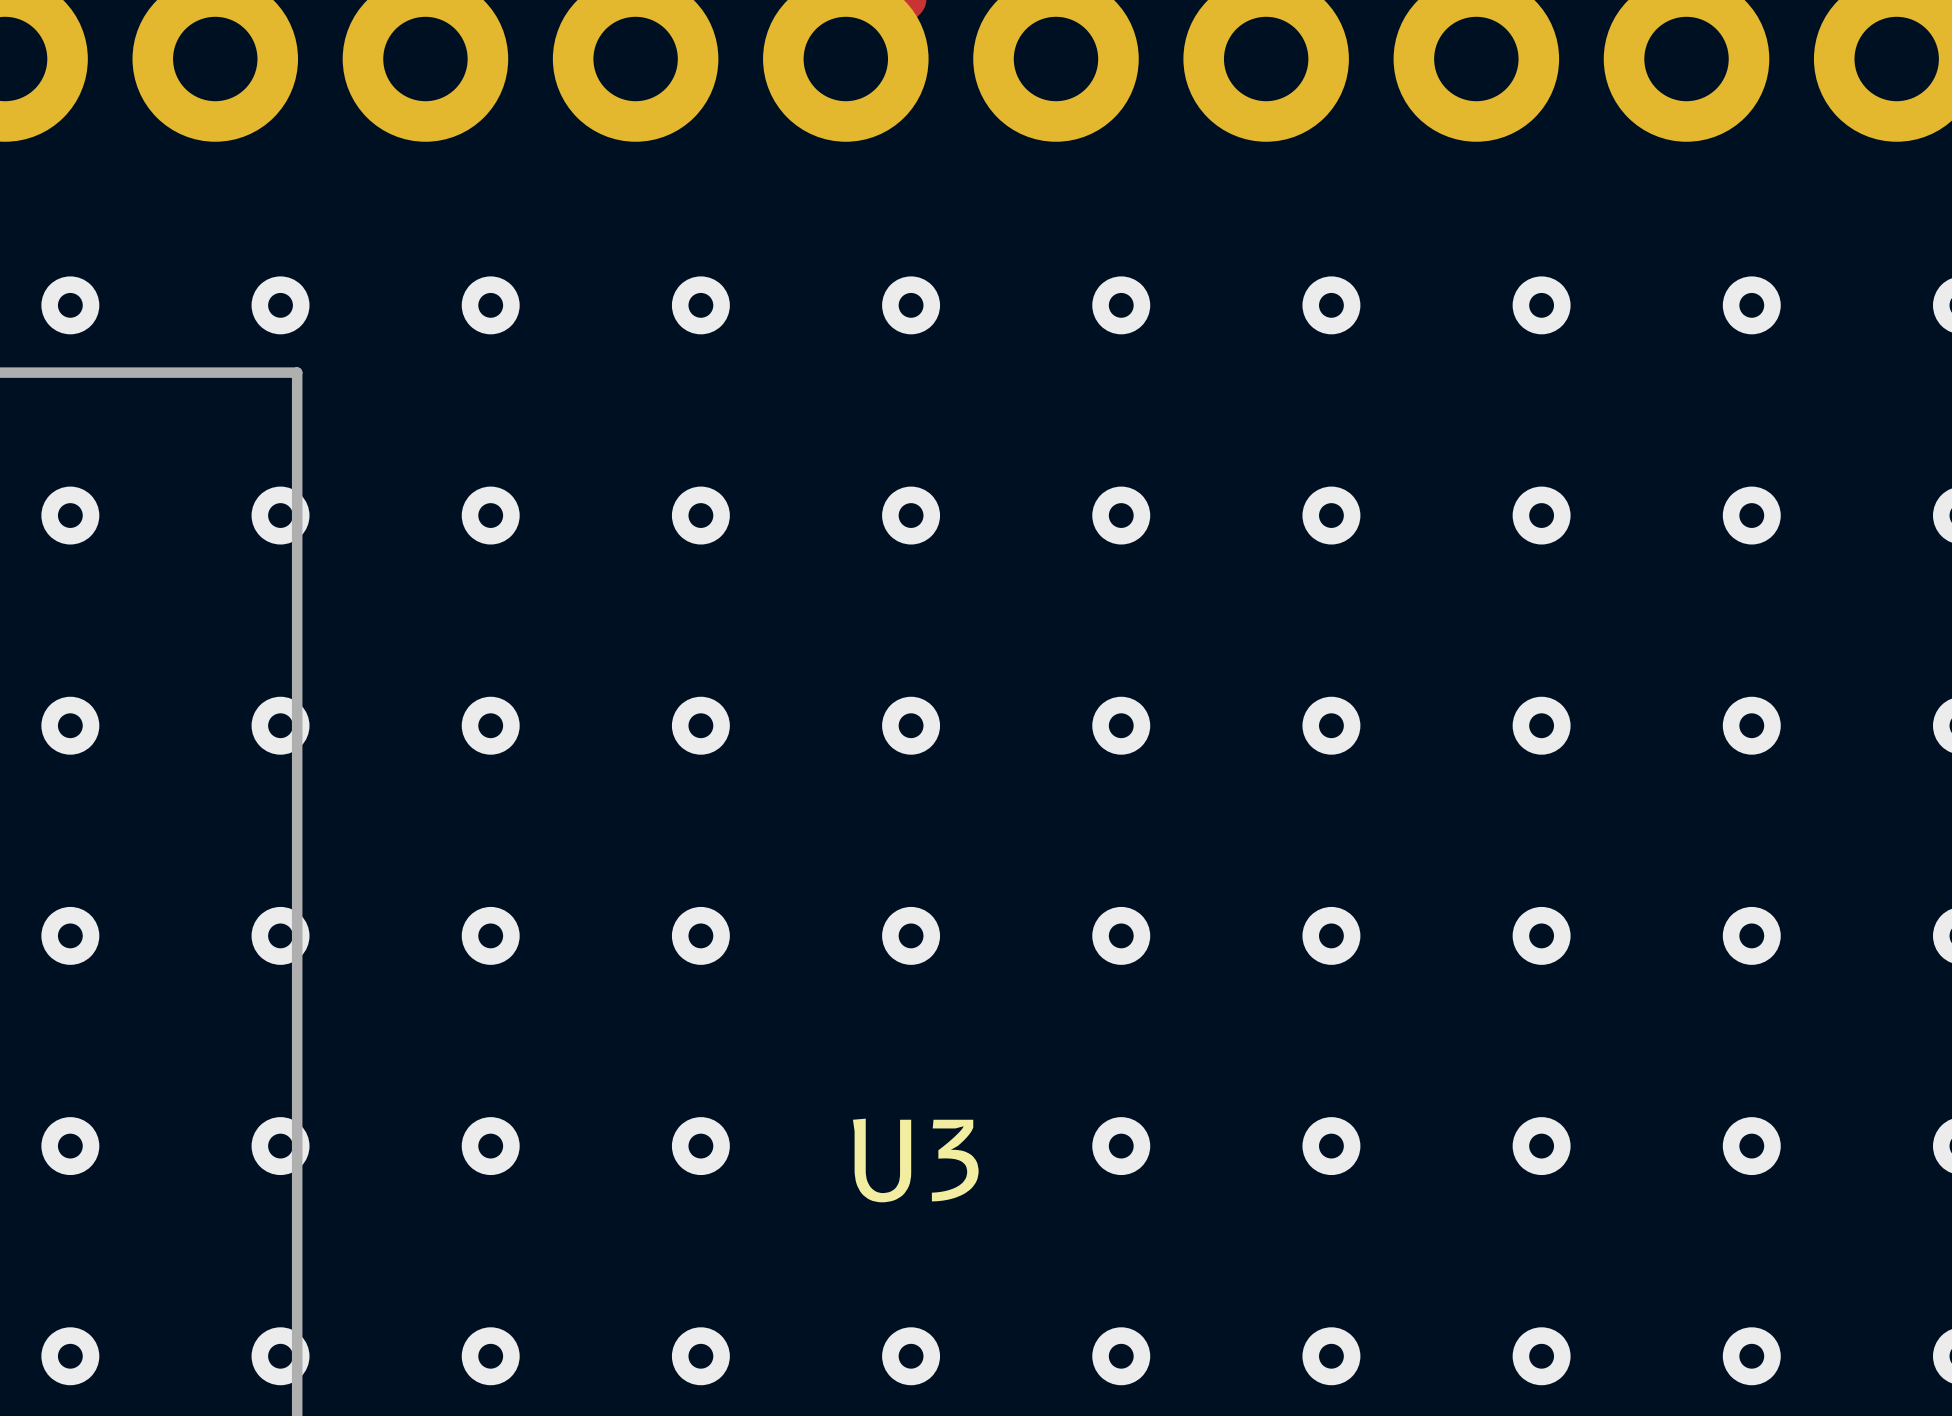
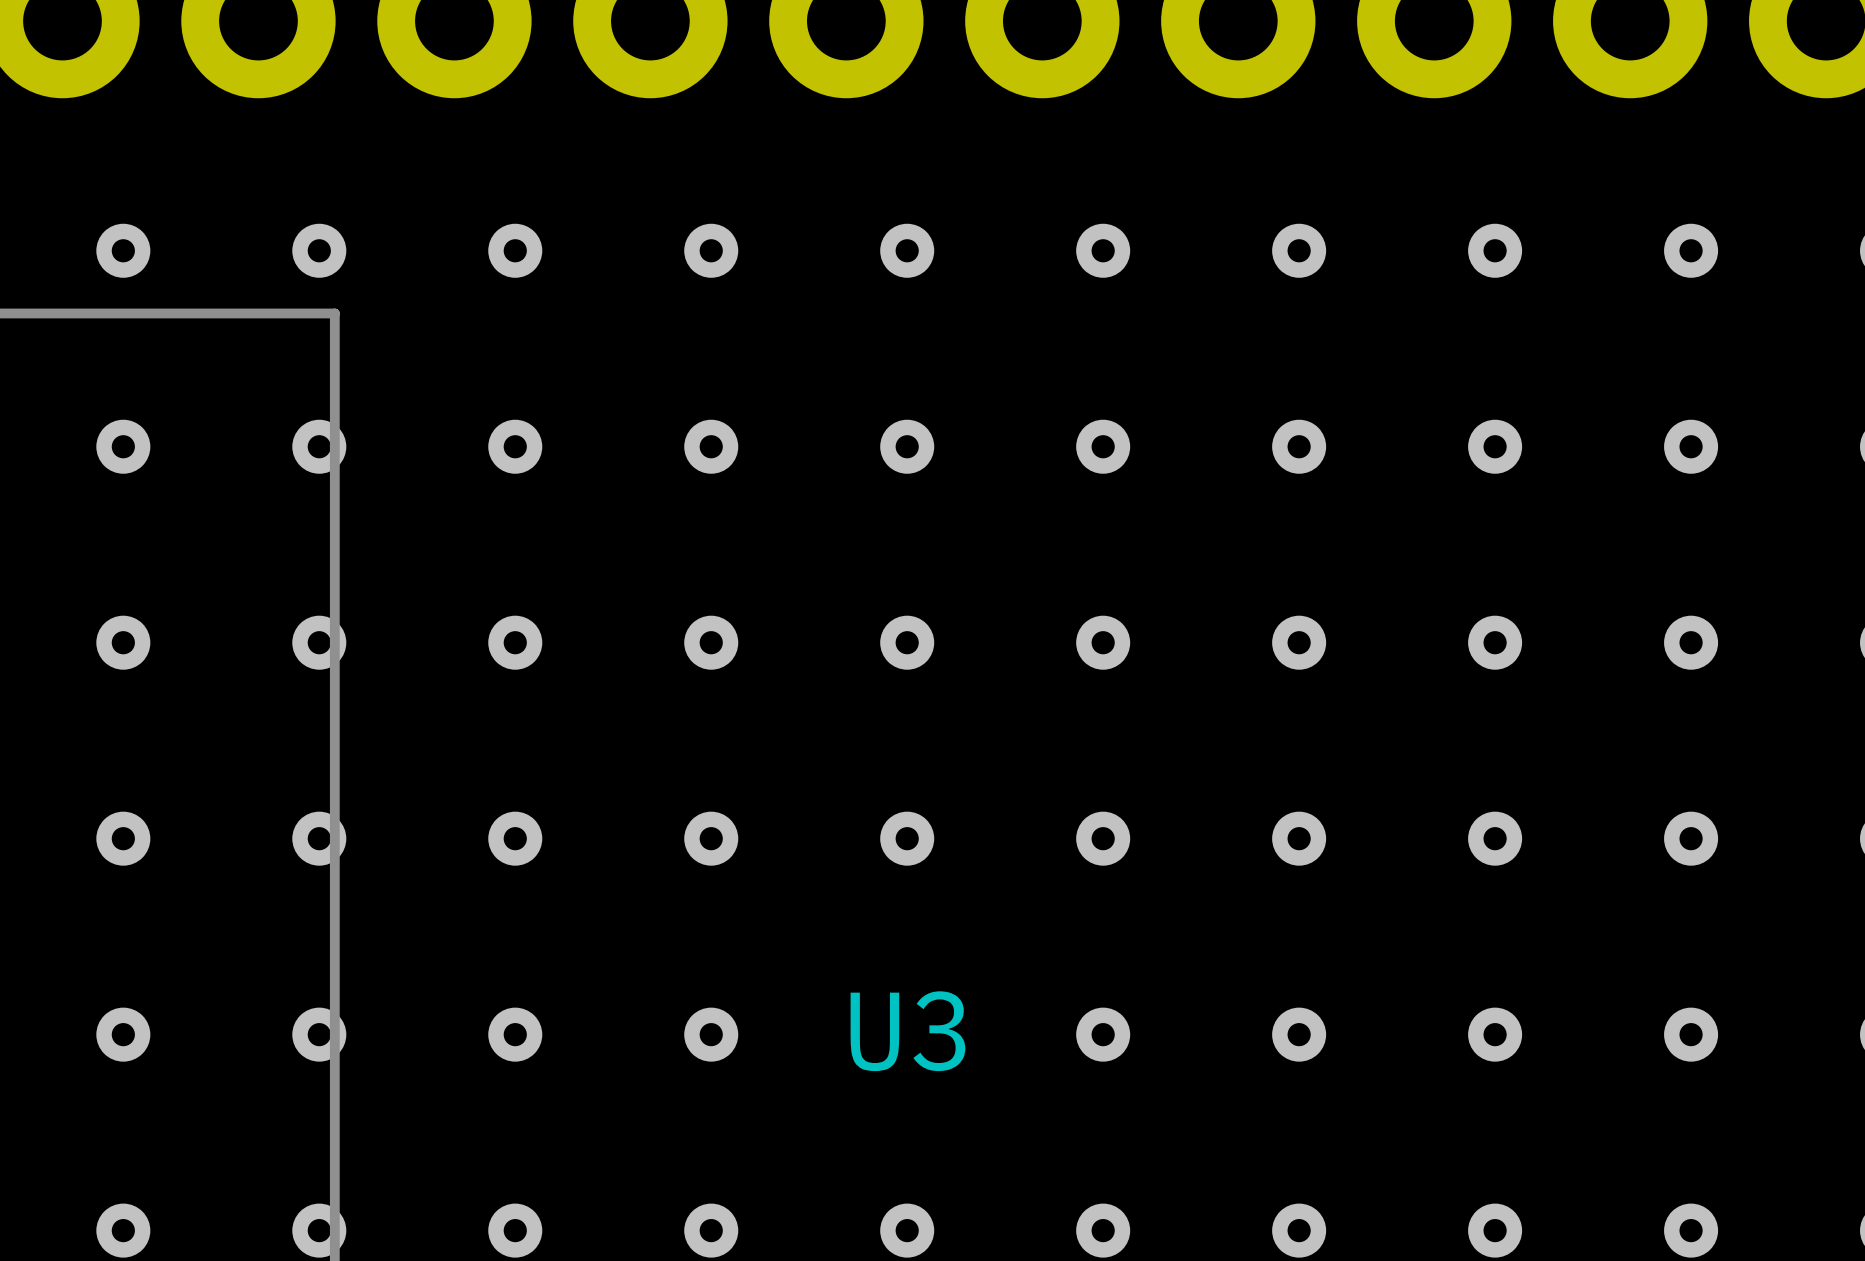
U3 name position: U3 (915, 1160) -> U3 (907, 1031)

